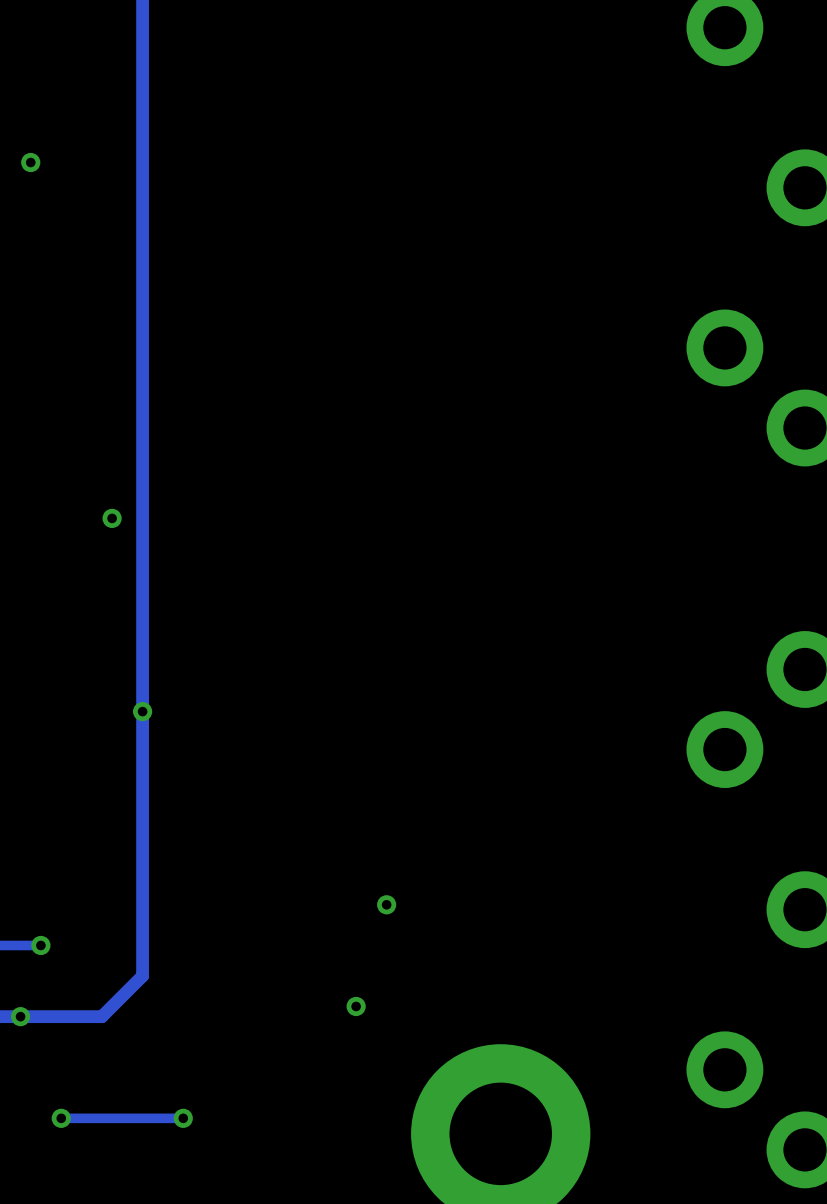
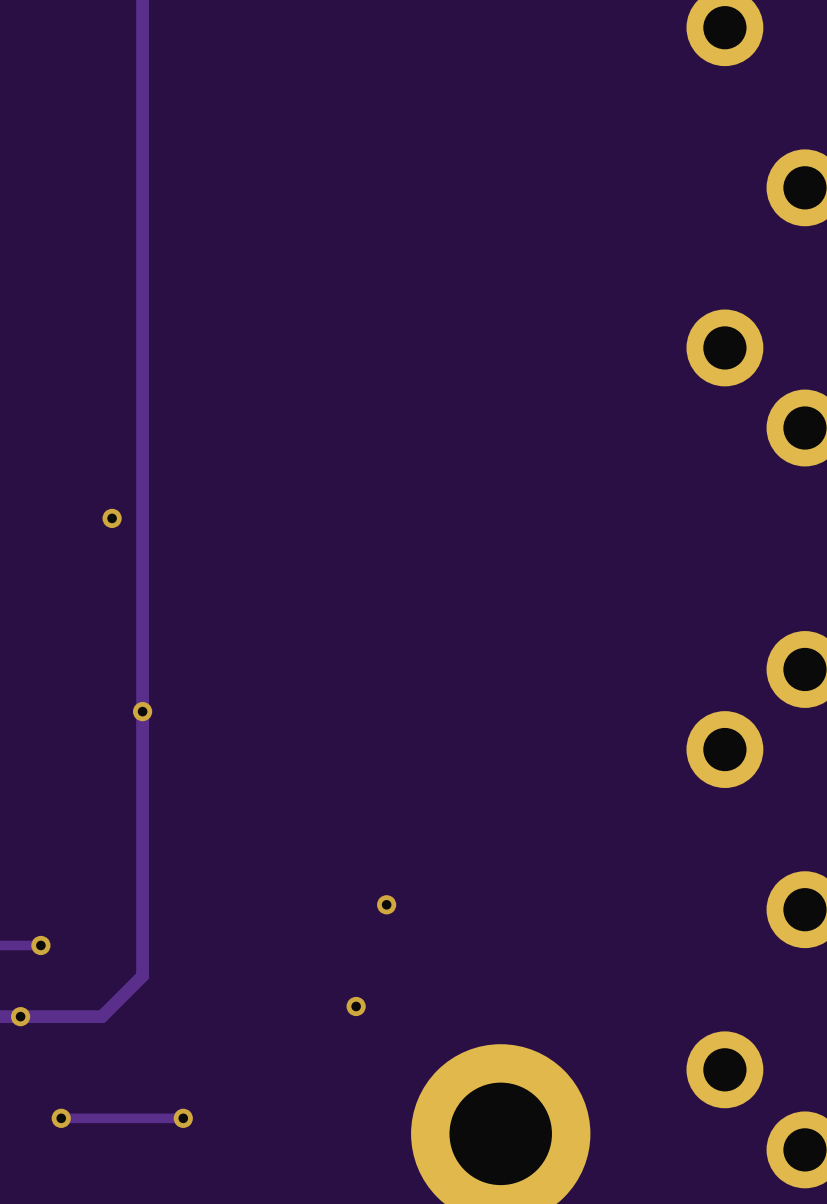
via: (30, 162) -> none

